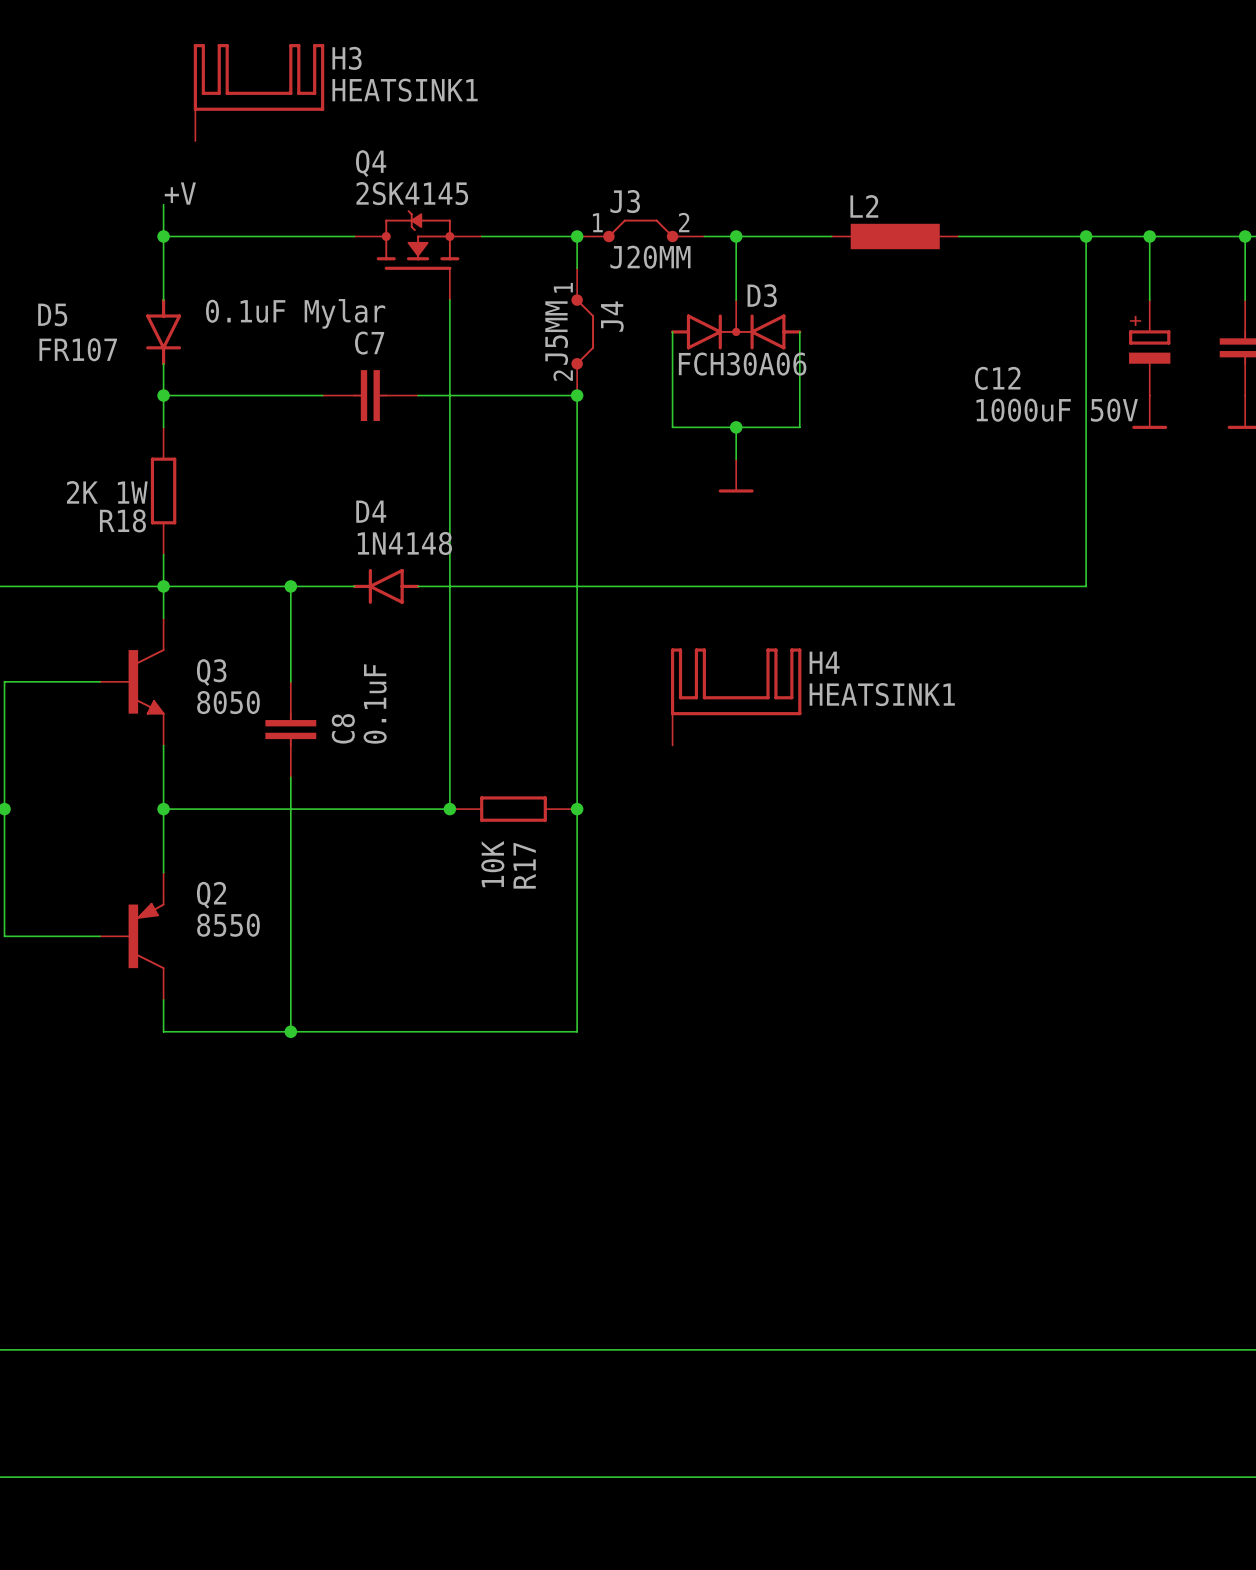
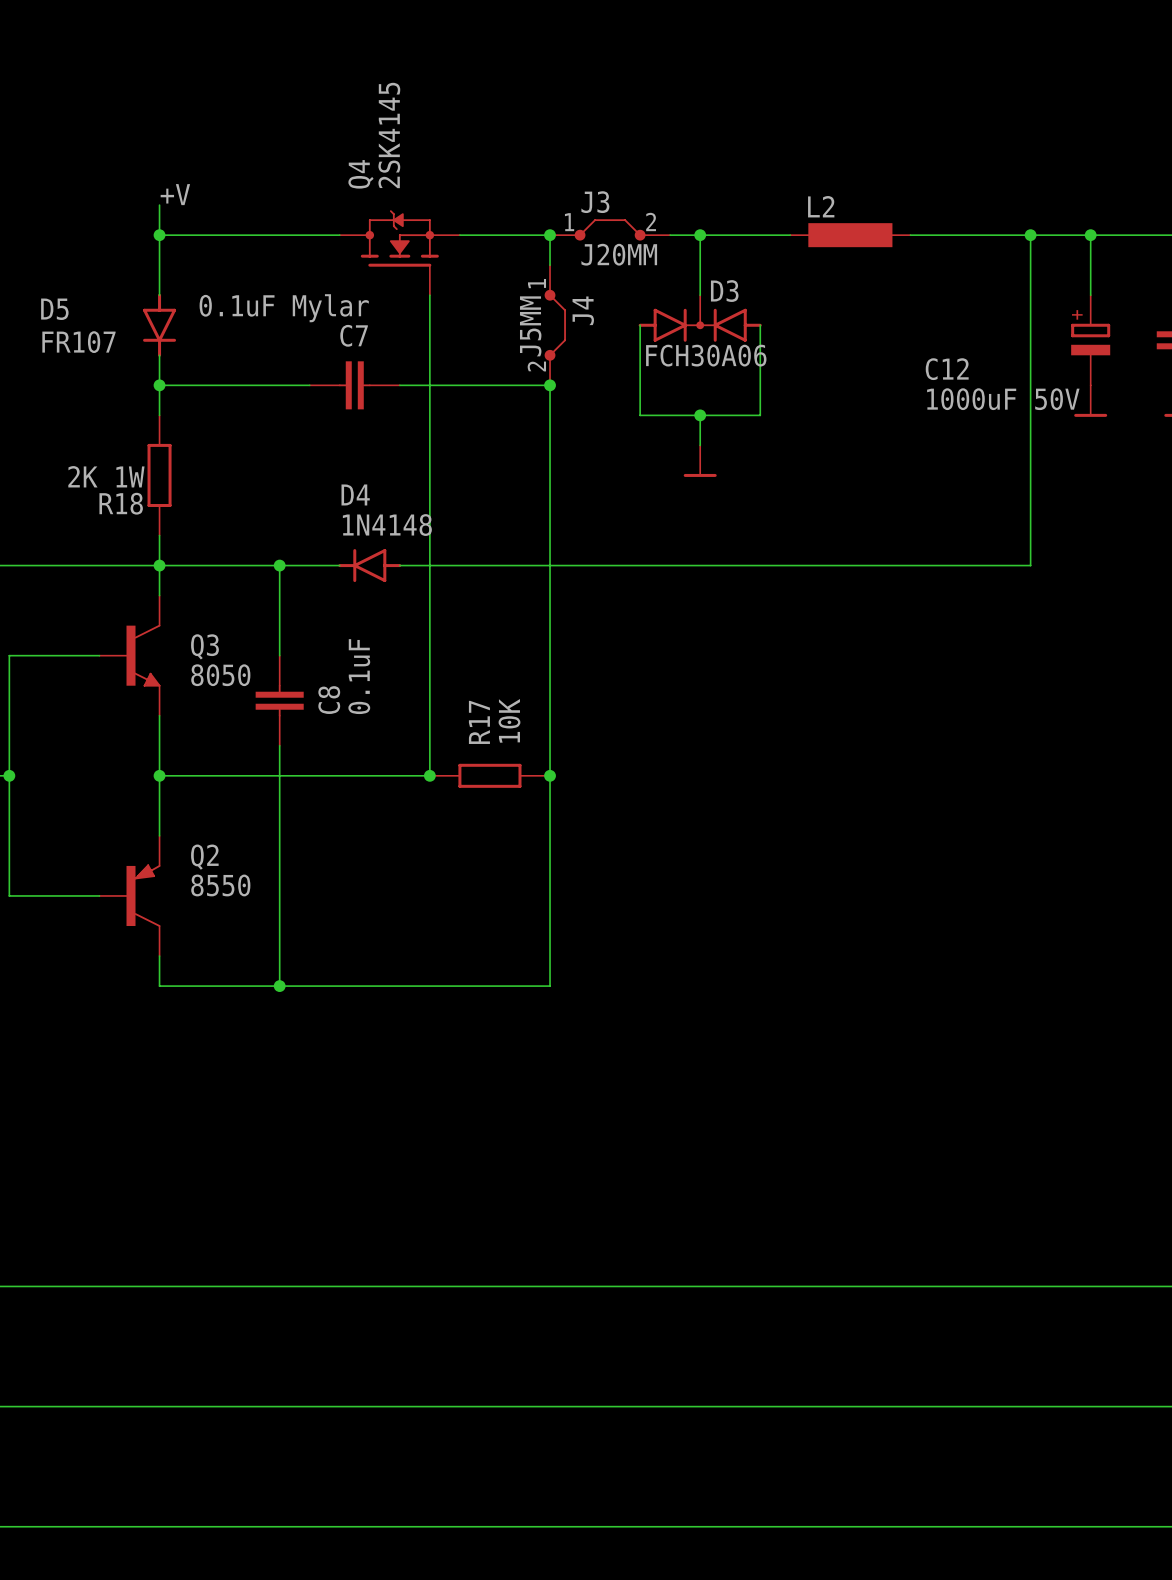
H3: HEATSINK1 (259, 92) -> none
Q4 name rotation: 0° (371, 163) -> 90° counterclockwise (361, 174)
Q4 value rotation: 0° (412, 193) -> 90° counterclockwise (389, 135)
H4: HEATSINK1 (736, 696) -> none
R17 value position: 10K (492, 864) -> 10K (509, 720)
R17 name position: R17 (524, 865) -> R17 (479, 722)

